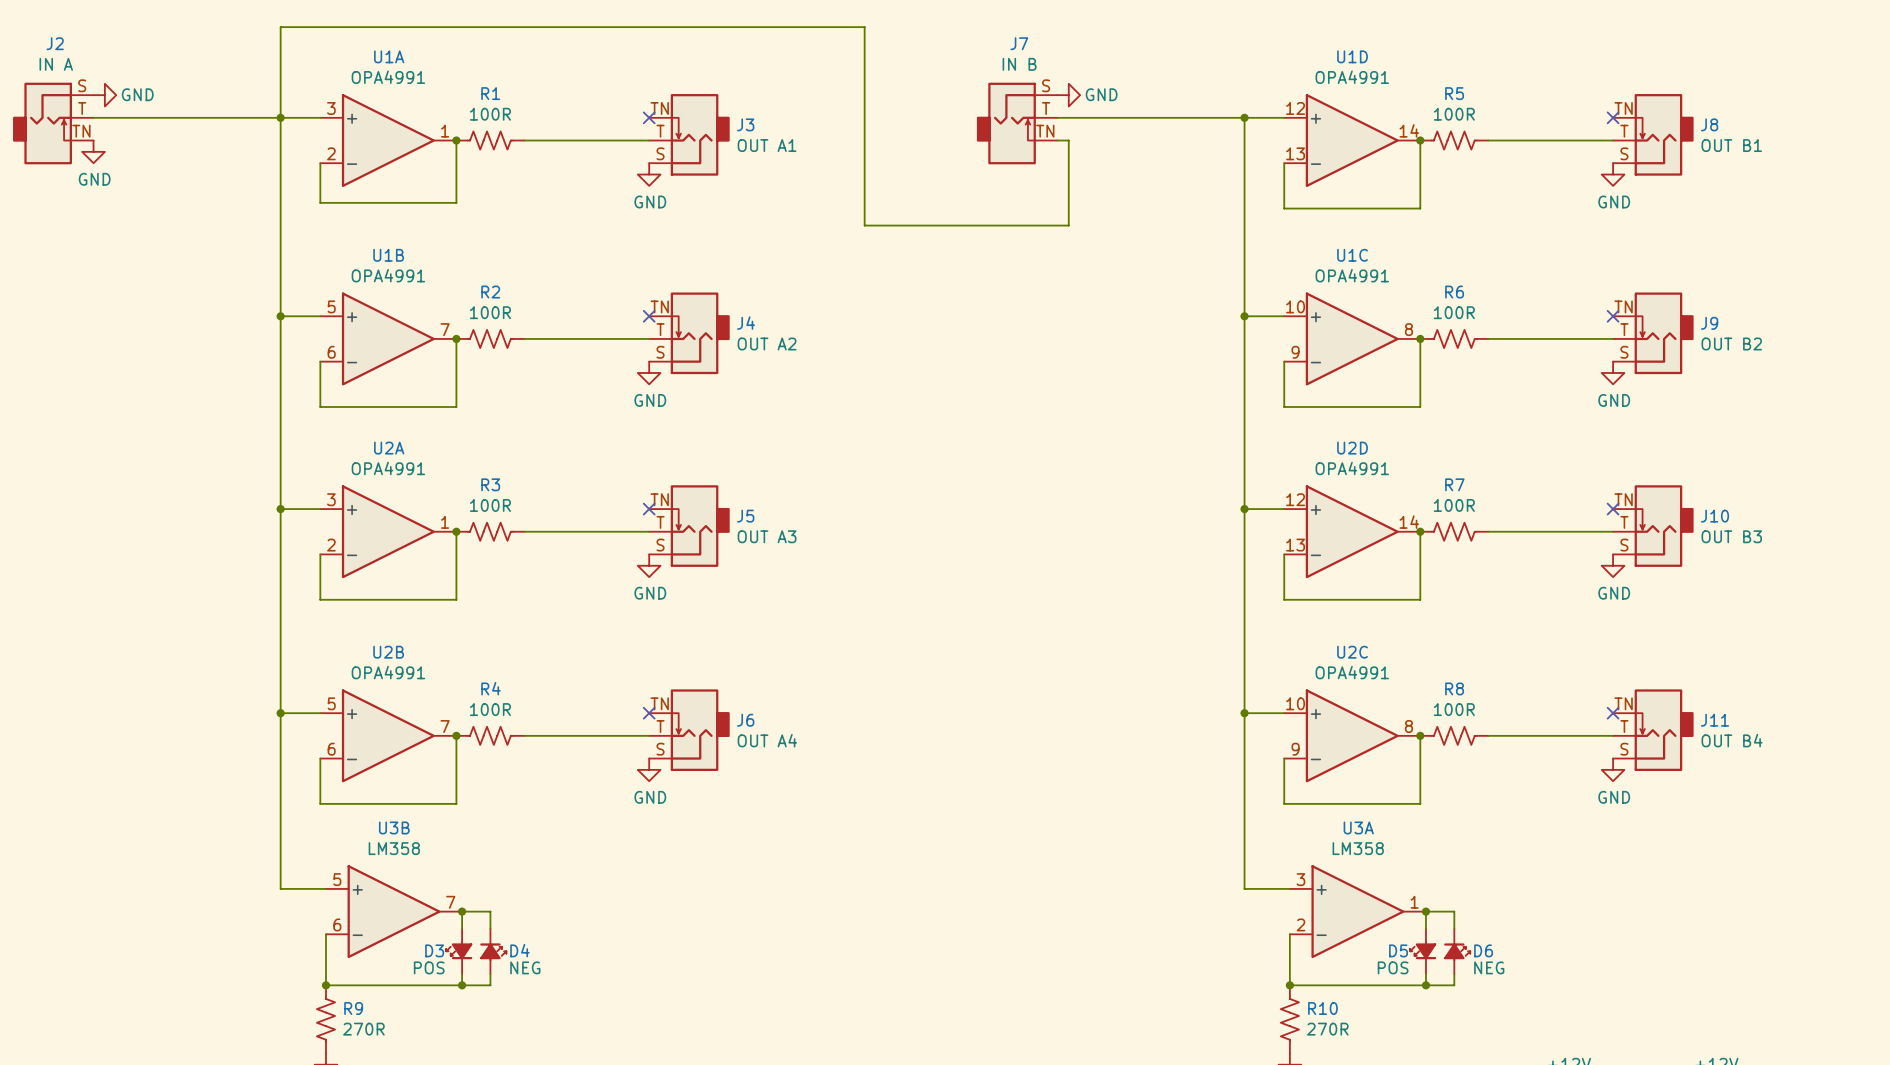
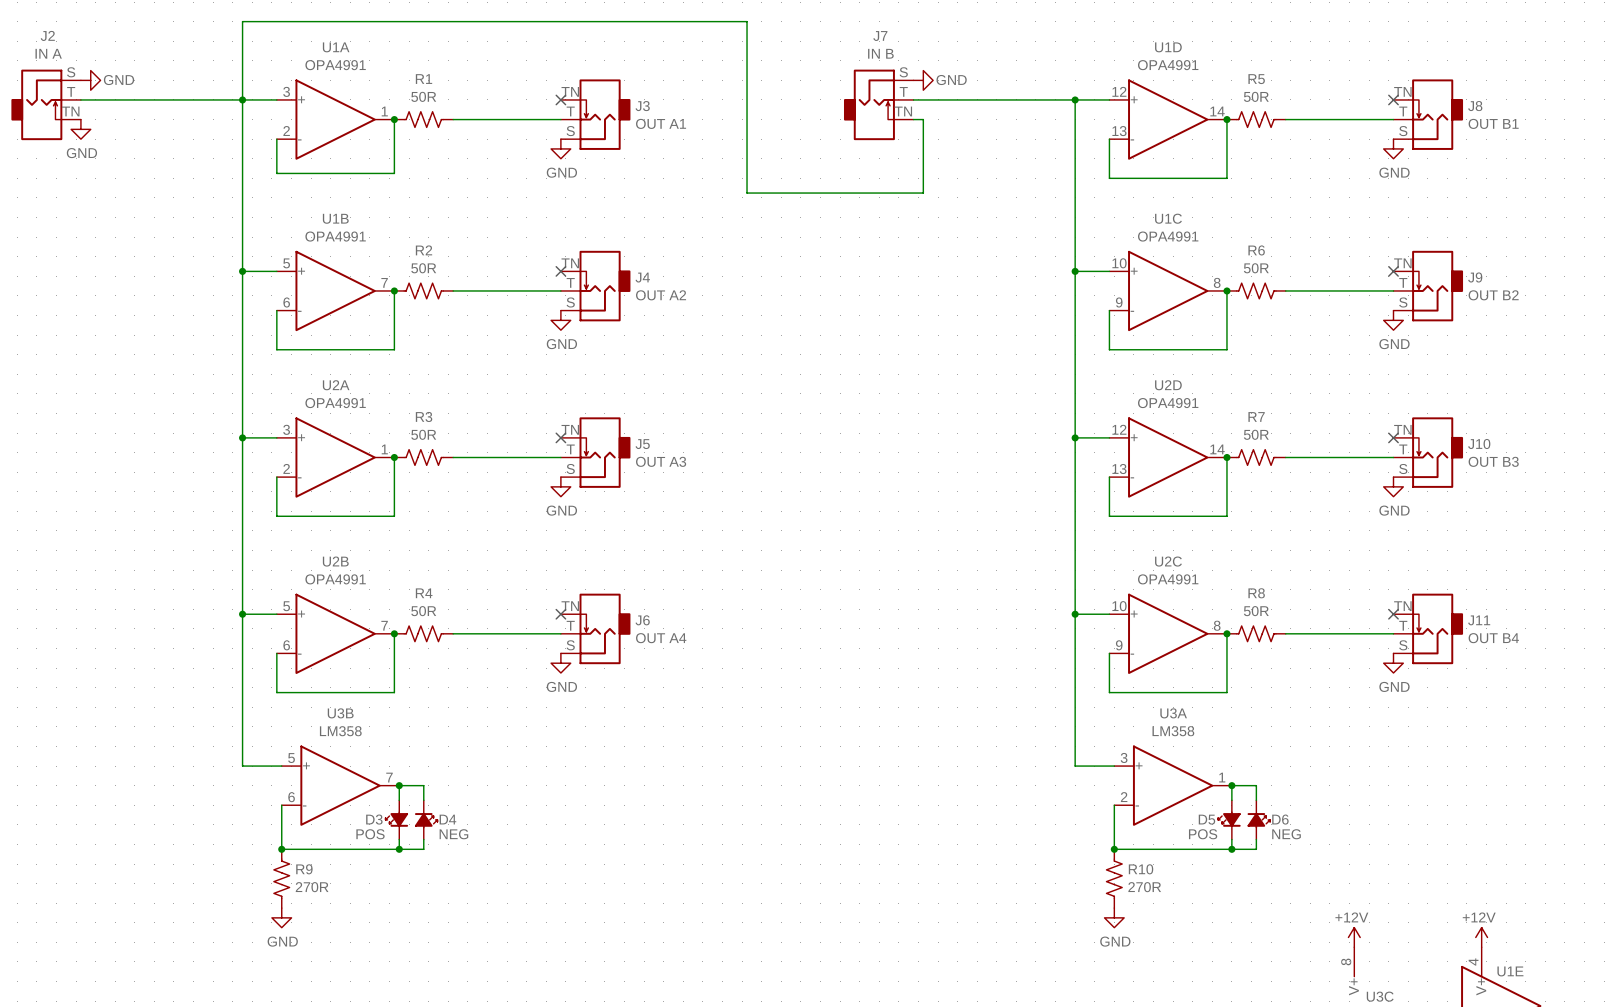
R1 value: 100R (490, 114) -> 50R (423, 96)
R5 value: 100R (1454, 114) -> 50R (1256, 96)
R2 value: 100R (490, 312) -> 50R (423, 268)
R6 value: 100R (1454, 312) -> 50R (1256, 268)
R3 value: 100R (490, 505) -> 50R (423, 434)
R7 value: 100R (1454, 505) -> 50R (1256, 434)
R4 value: 100R (490, 709) -> 50R (423, 611)
R8 value: 100R (1454, 709) -> 50R (1256, 611)

